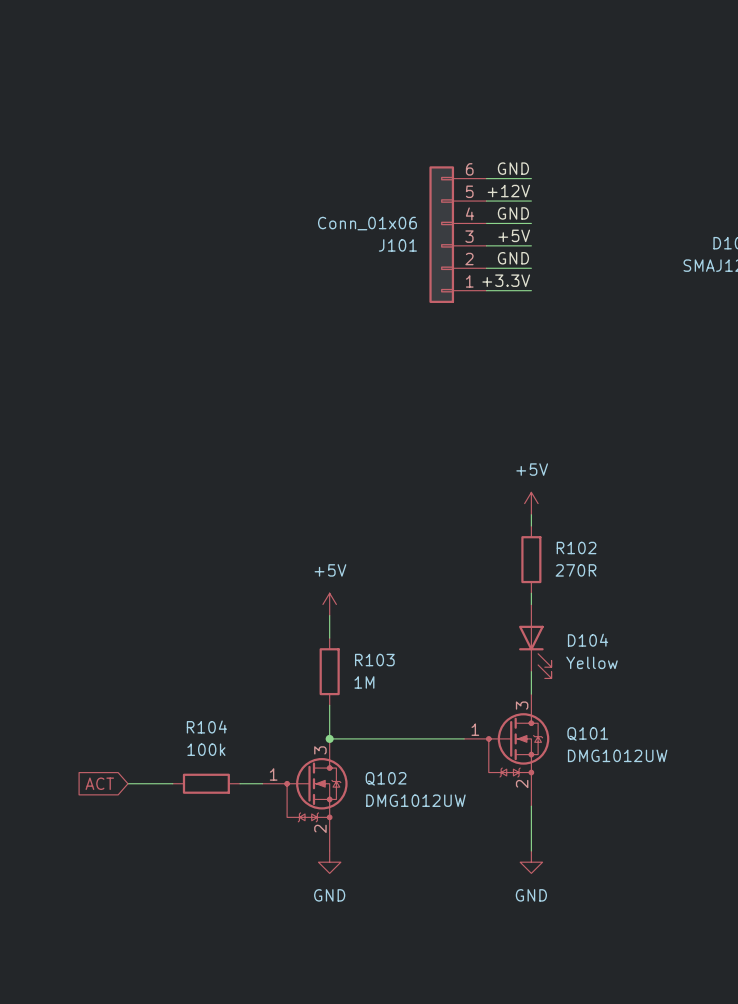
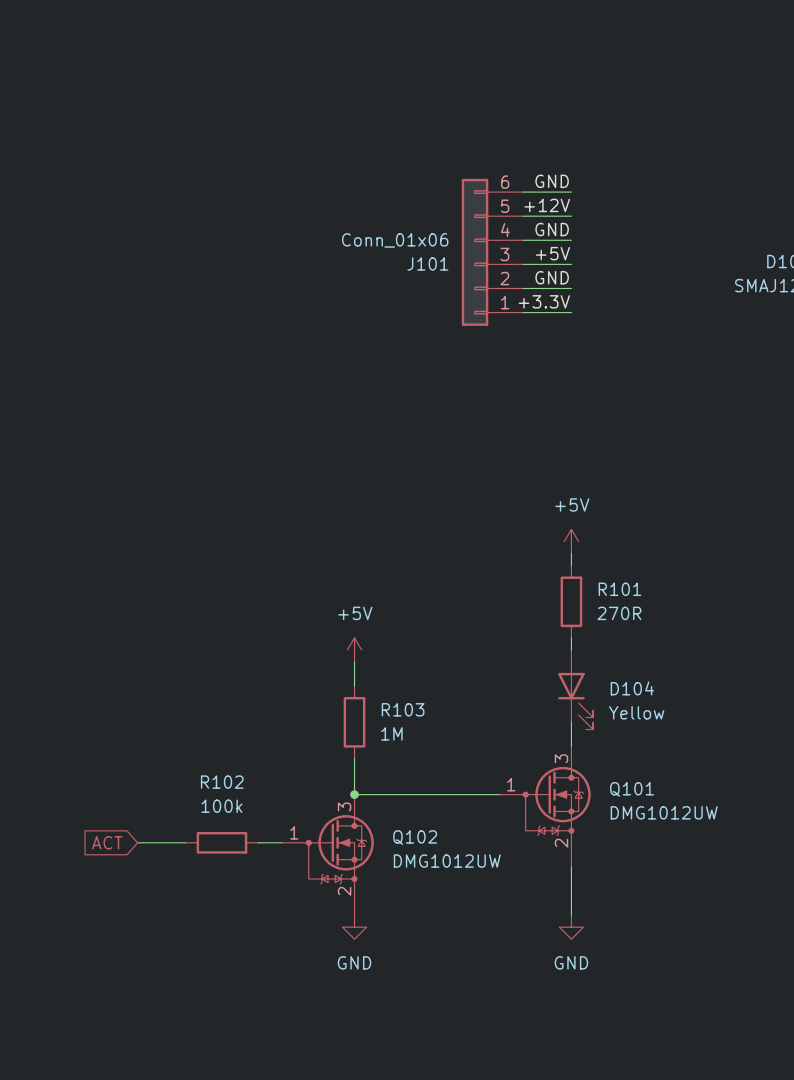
R102 name: R102 (576, 548) -> R101 (620, 589)
R104 name: R104 (206, 727) -> R102 (222, 782)

